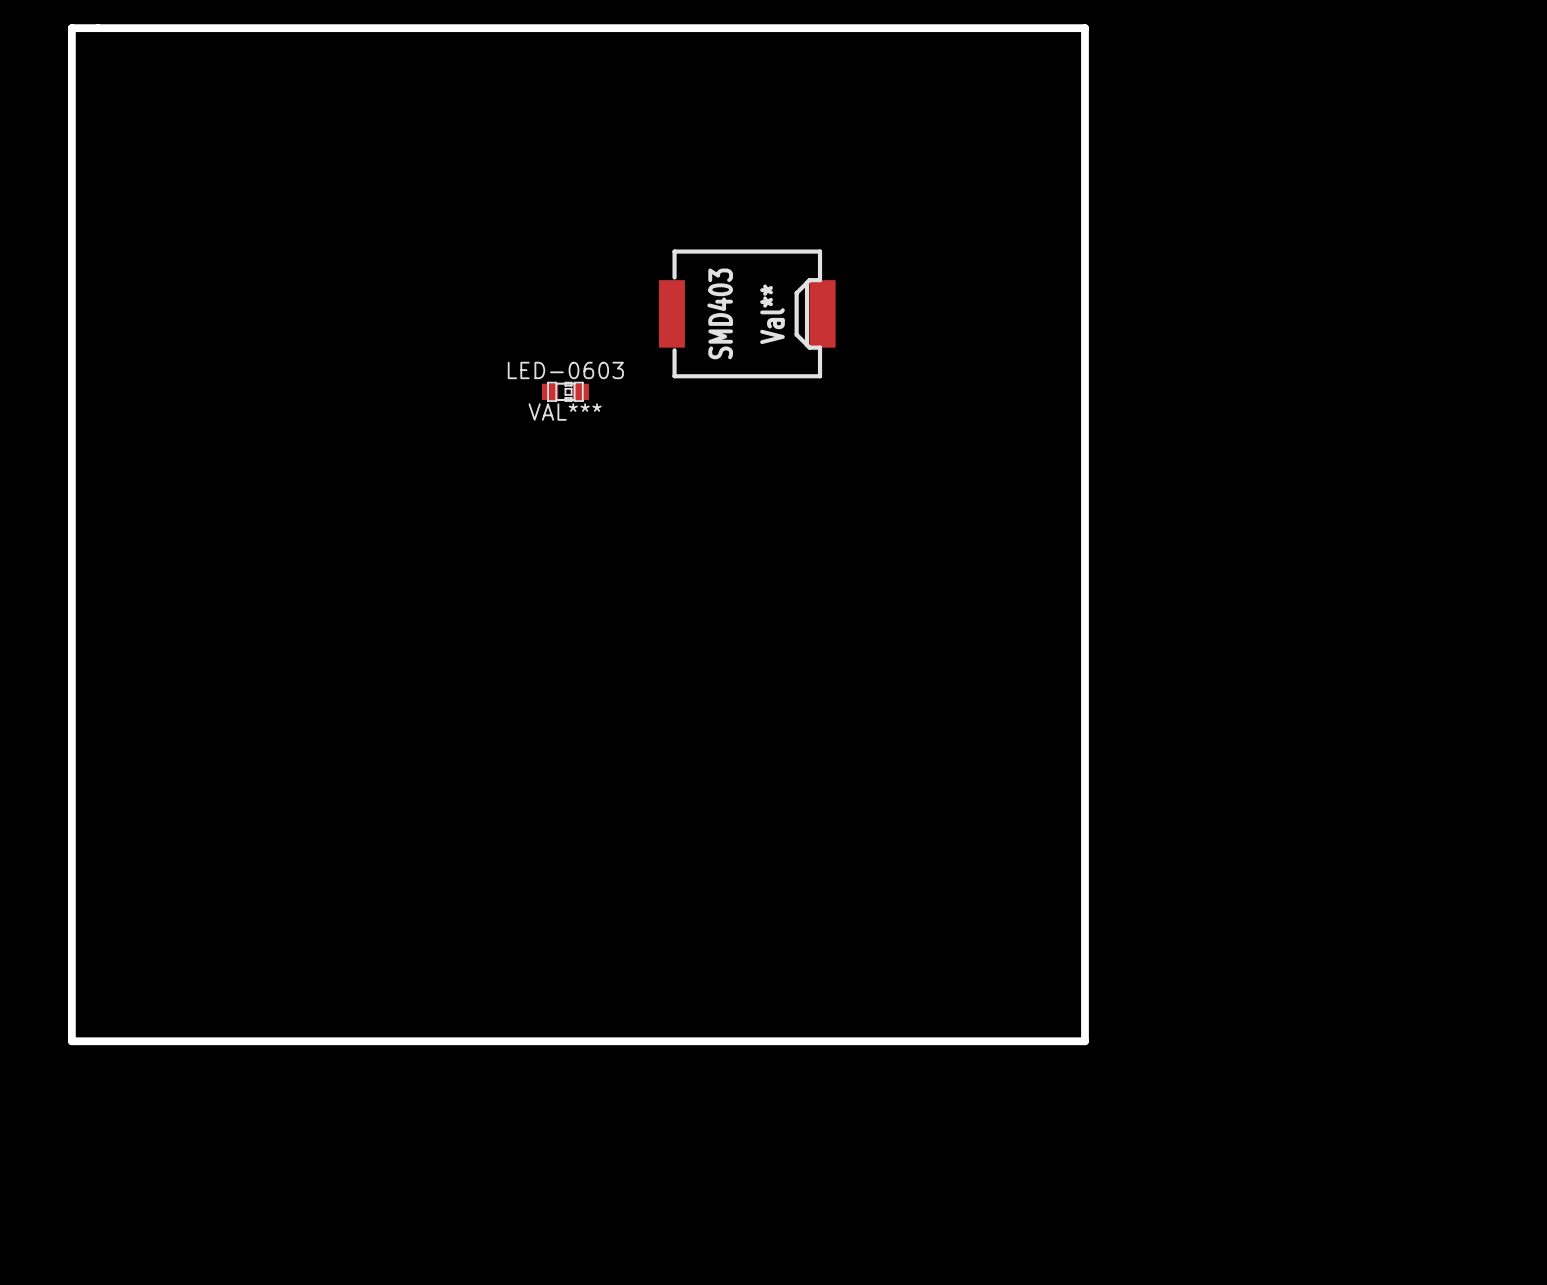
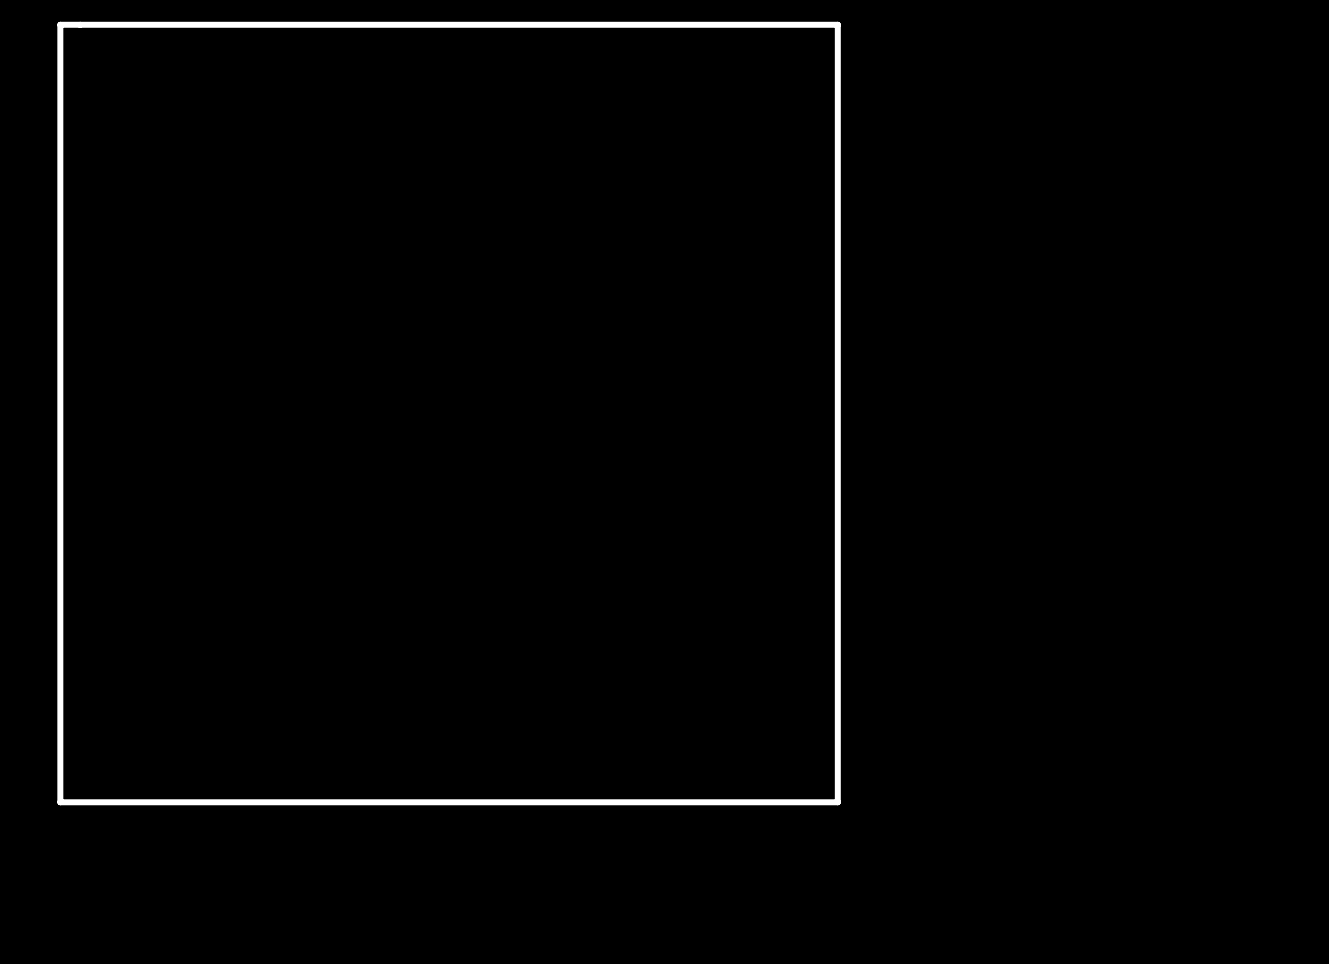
SMD403: Val** (747, 313) -> none
LED-0603: VAL*** (565, 391) -> none

